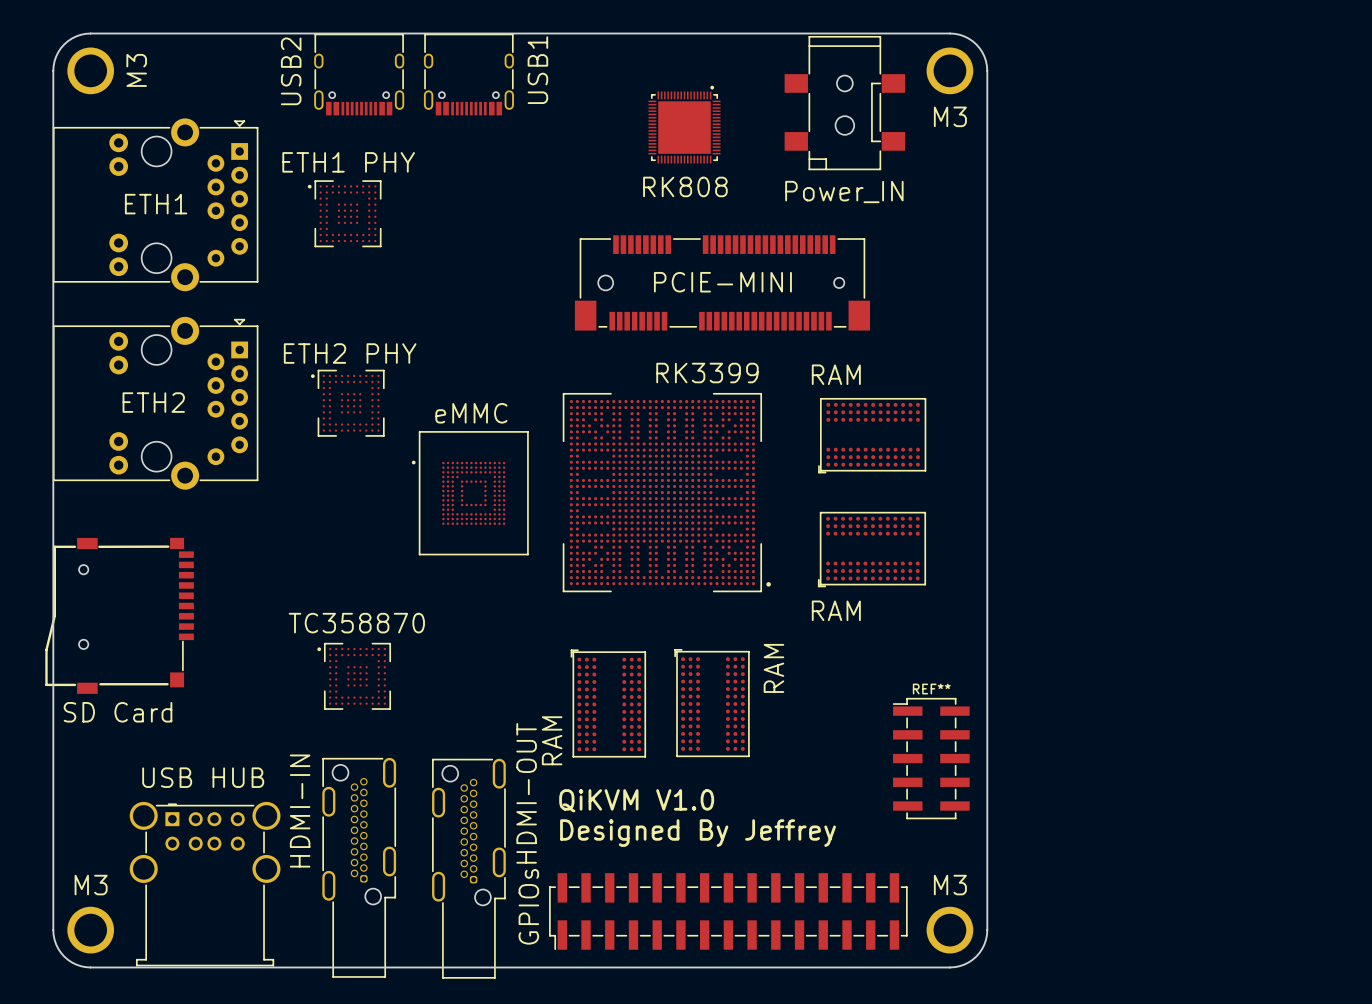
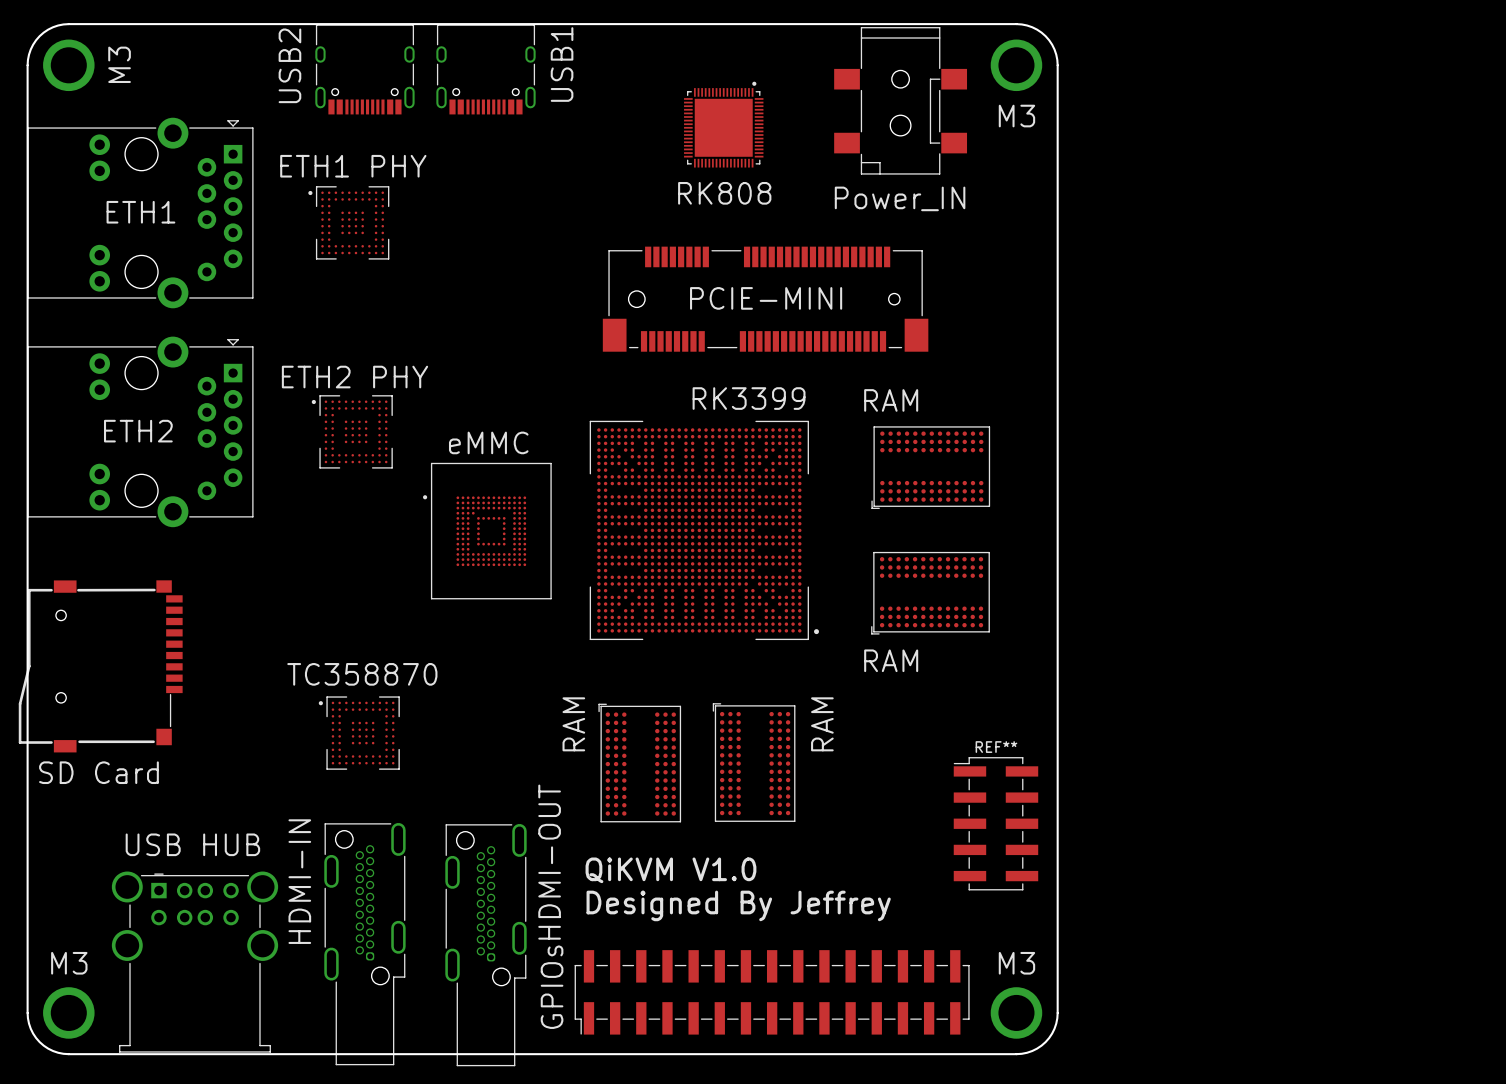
RAM name position: RAM (552, 740) -> RAM (573, 724)

